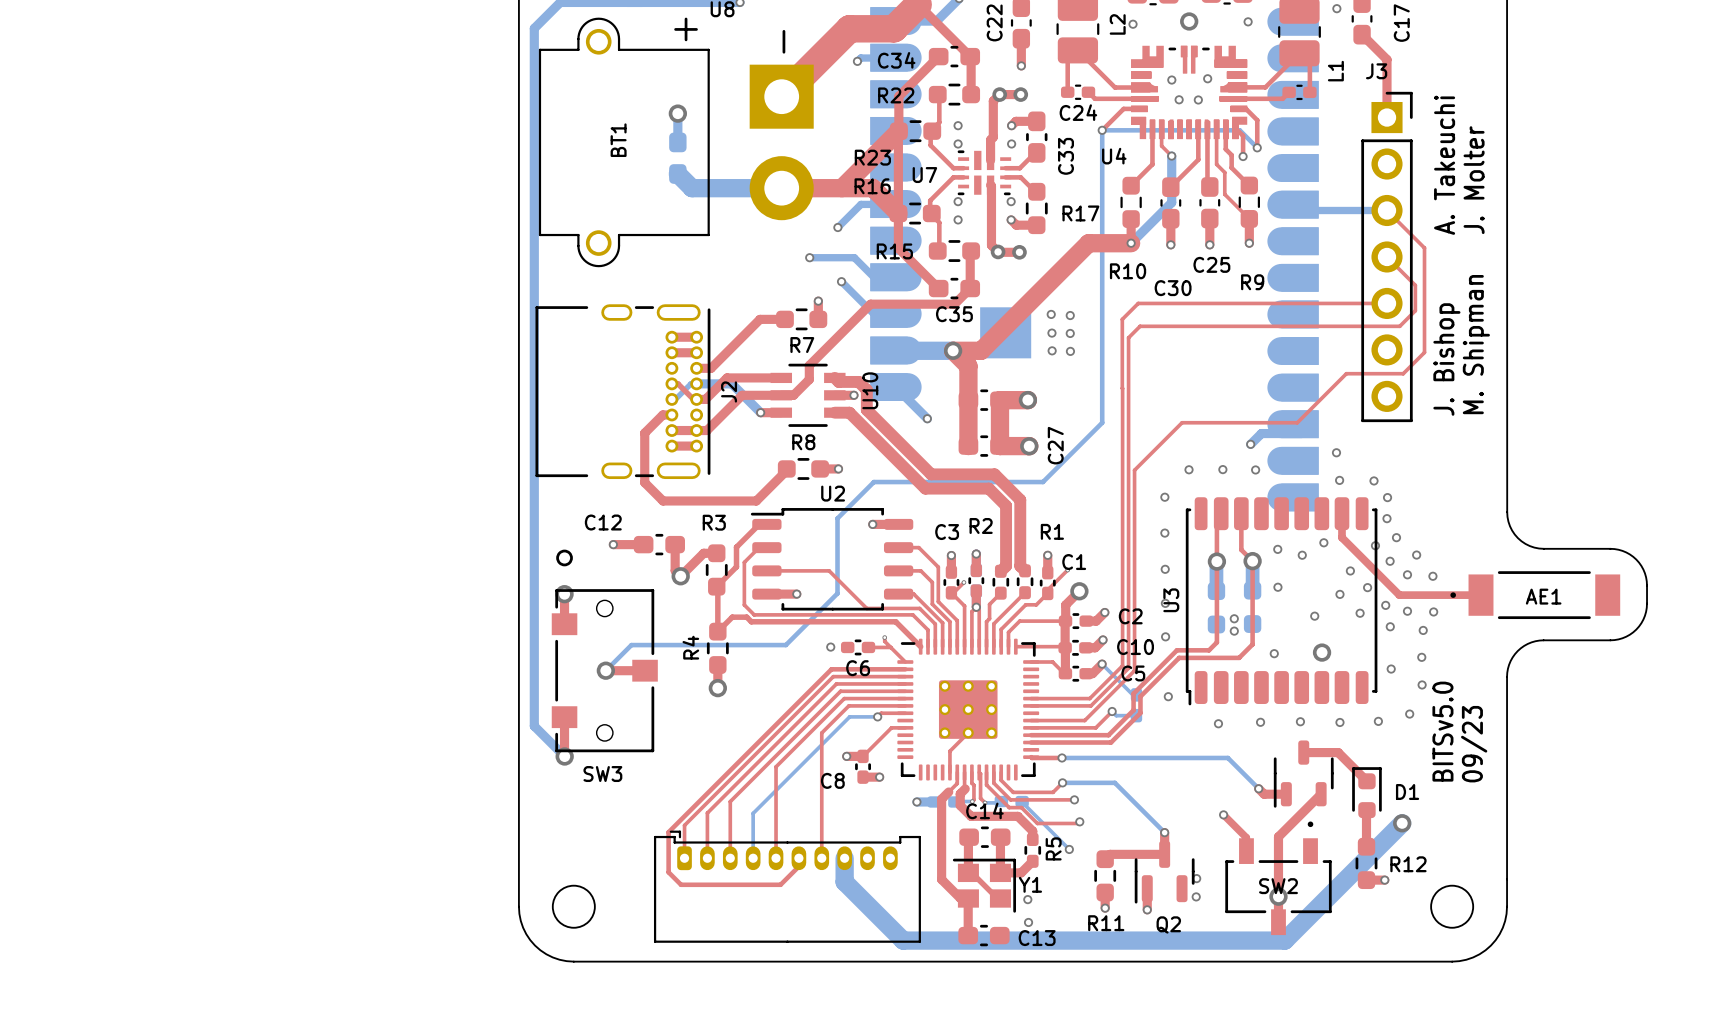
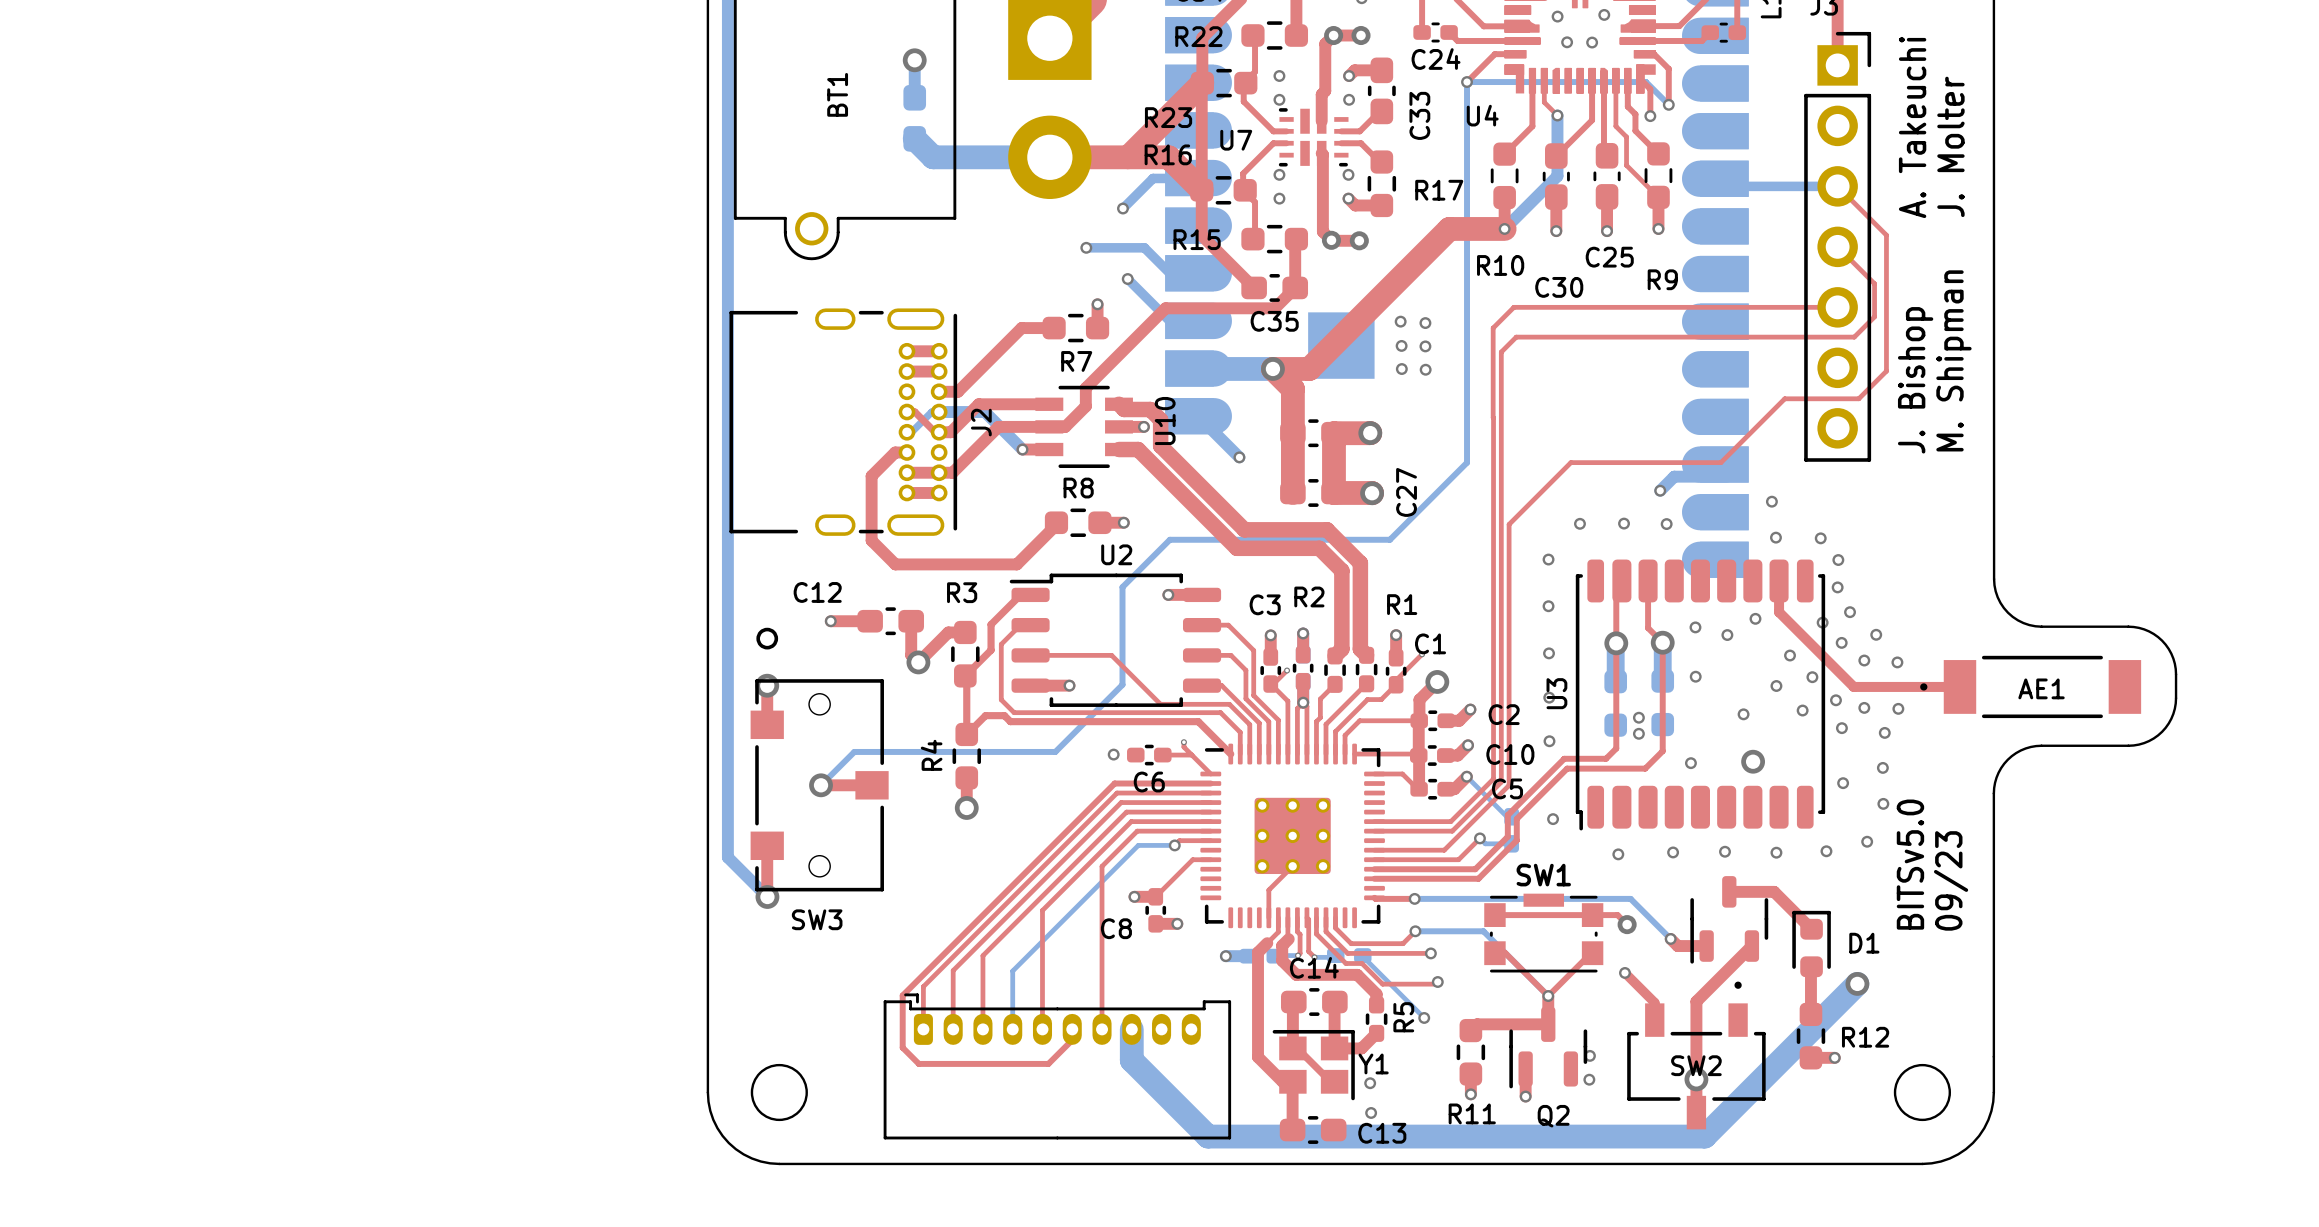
top track: none -> (1494, 915) (1617, 915) (1627, 924)
via: none -> (1627, 924)
SW1: none -> (1543, 933)
top track: none -> (1494, 953) (1505, 953) (1548, 996) (1592, 953)

